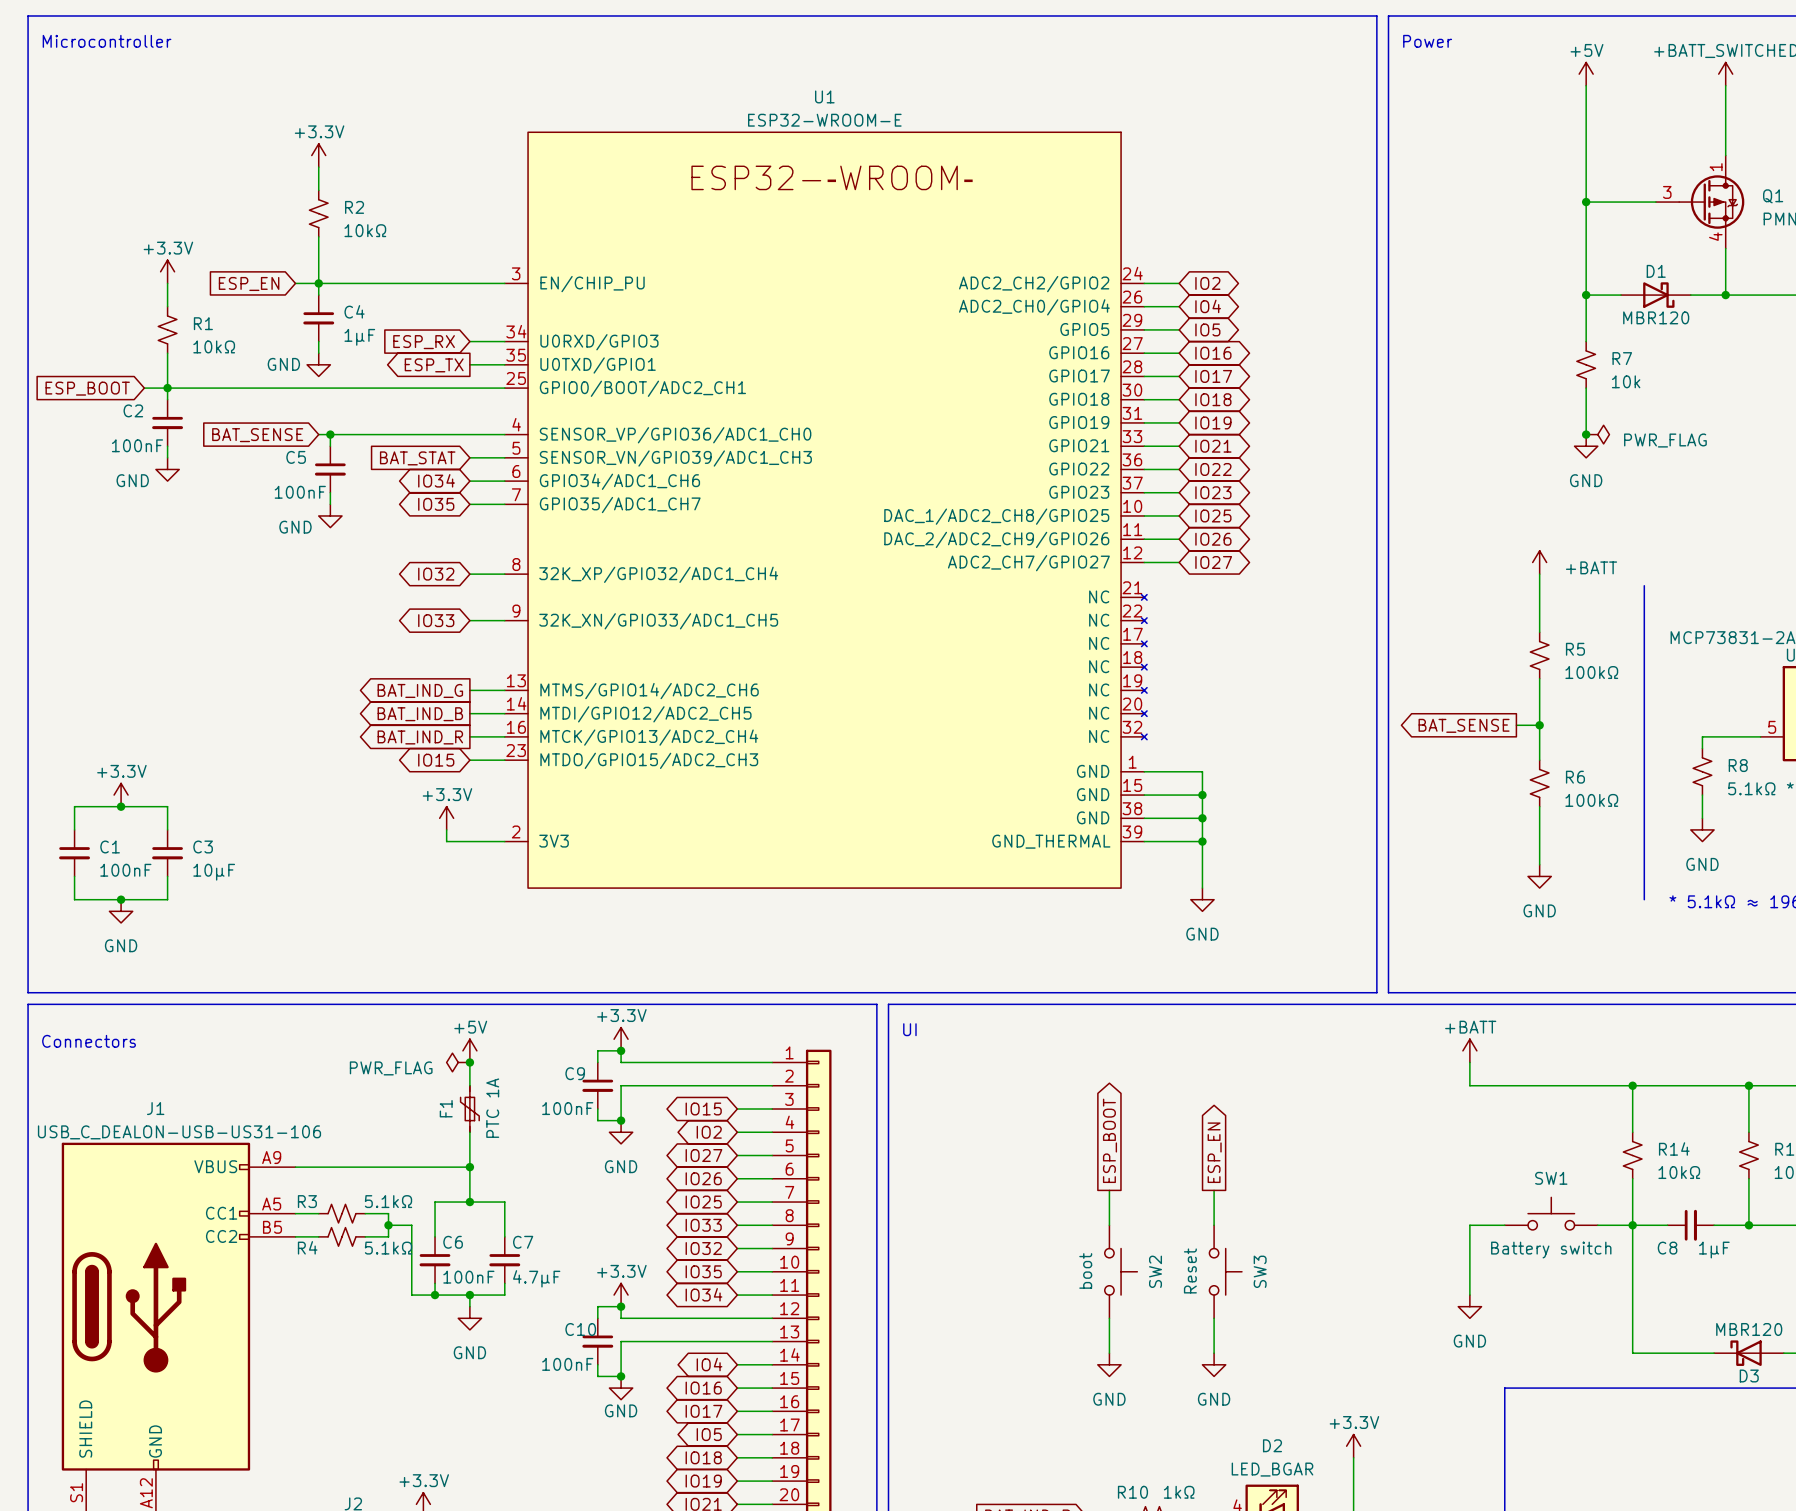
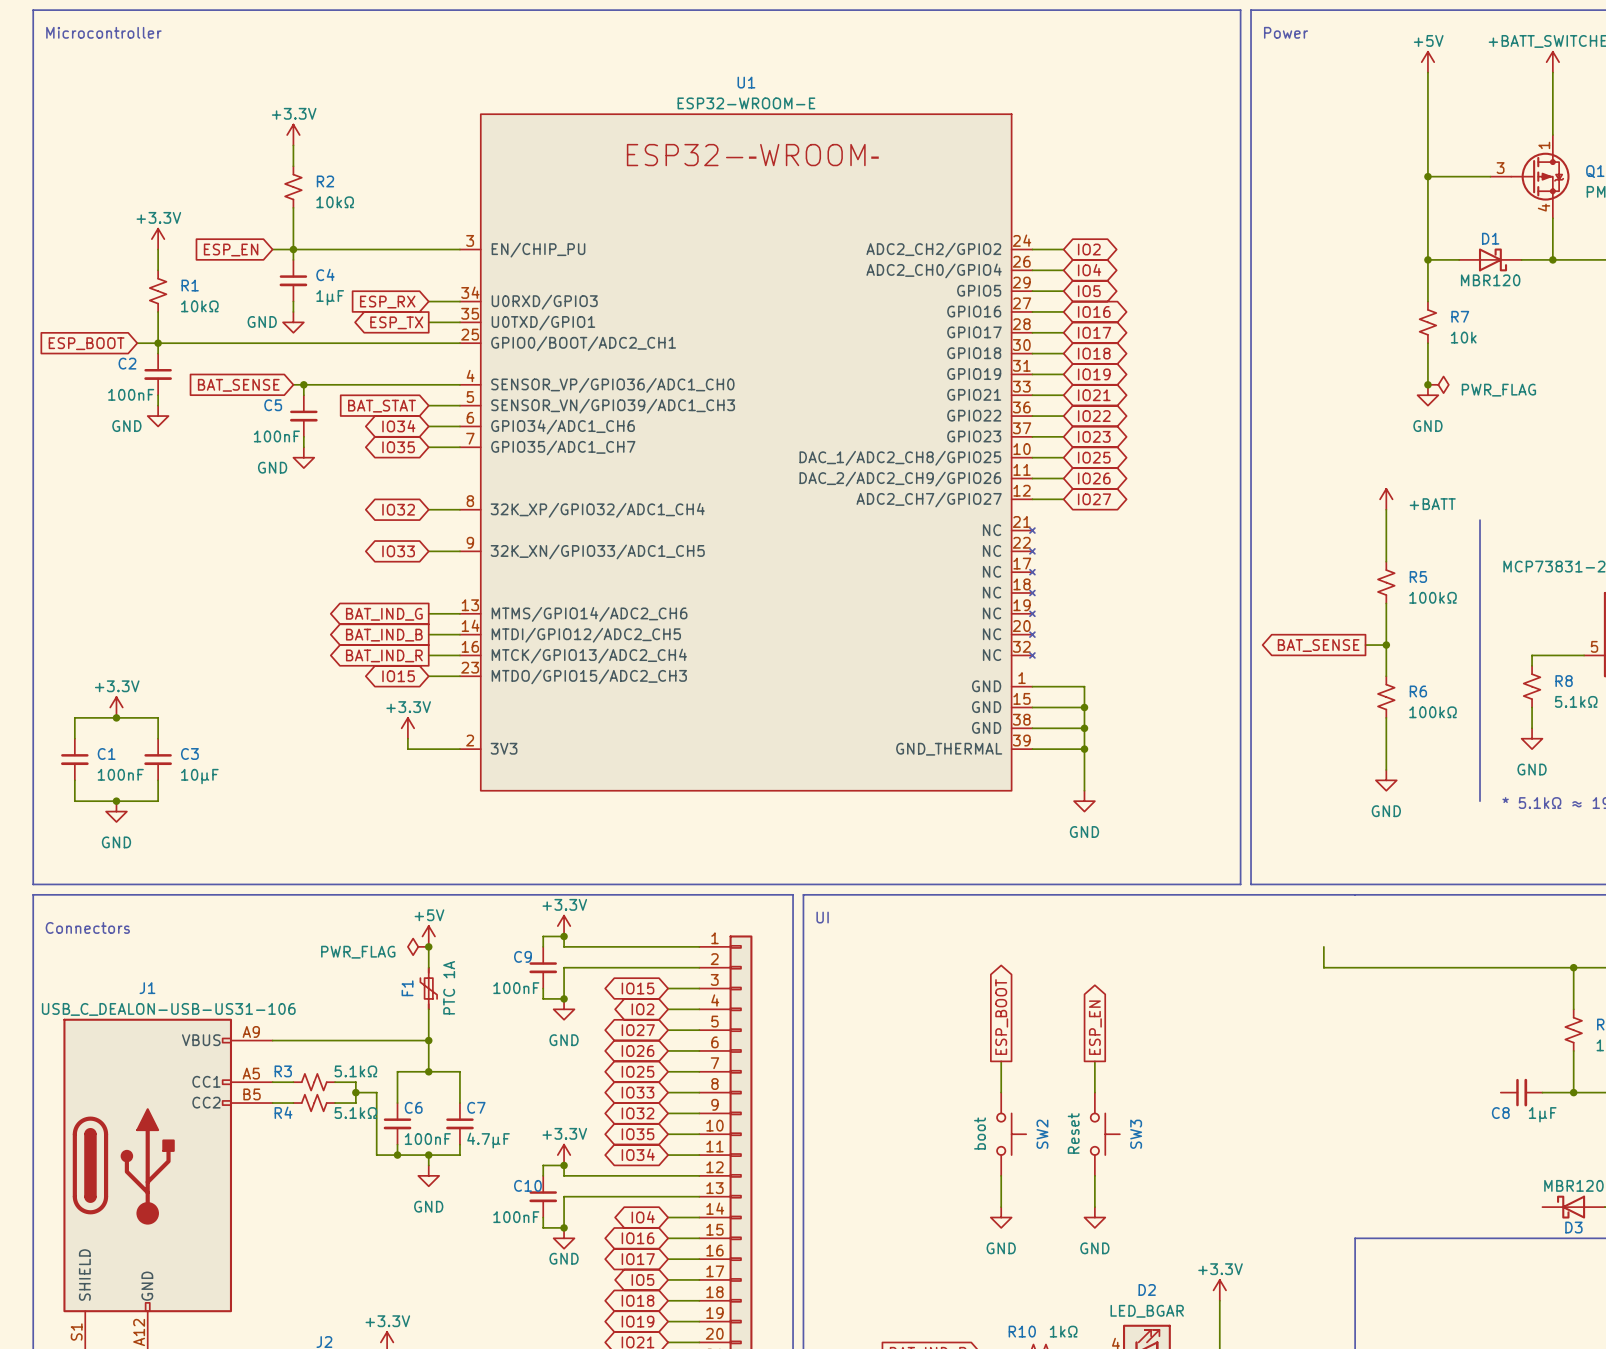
power symbol: +BATT (1469, 1050) -> none
wire: (1632, 1085) (1632, 1132) -> none
junction: (1632, 1085) -> none
R14: 10kΩ (1632, 1155) -> none
wire: (1632, 1178) (1632, 1353) (1714, 1353) -> none
SW1: Battery switch (1551, 1213) -> none
wire: (1504, 1225) (1469, 1225) (1469, 1295) -> none
wire: (1597, 1225) (1667, 1225) -> none
junction: (1632, 1225) -> none
power symbol: GND (1469, 1306) -> none

